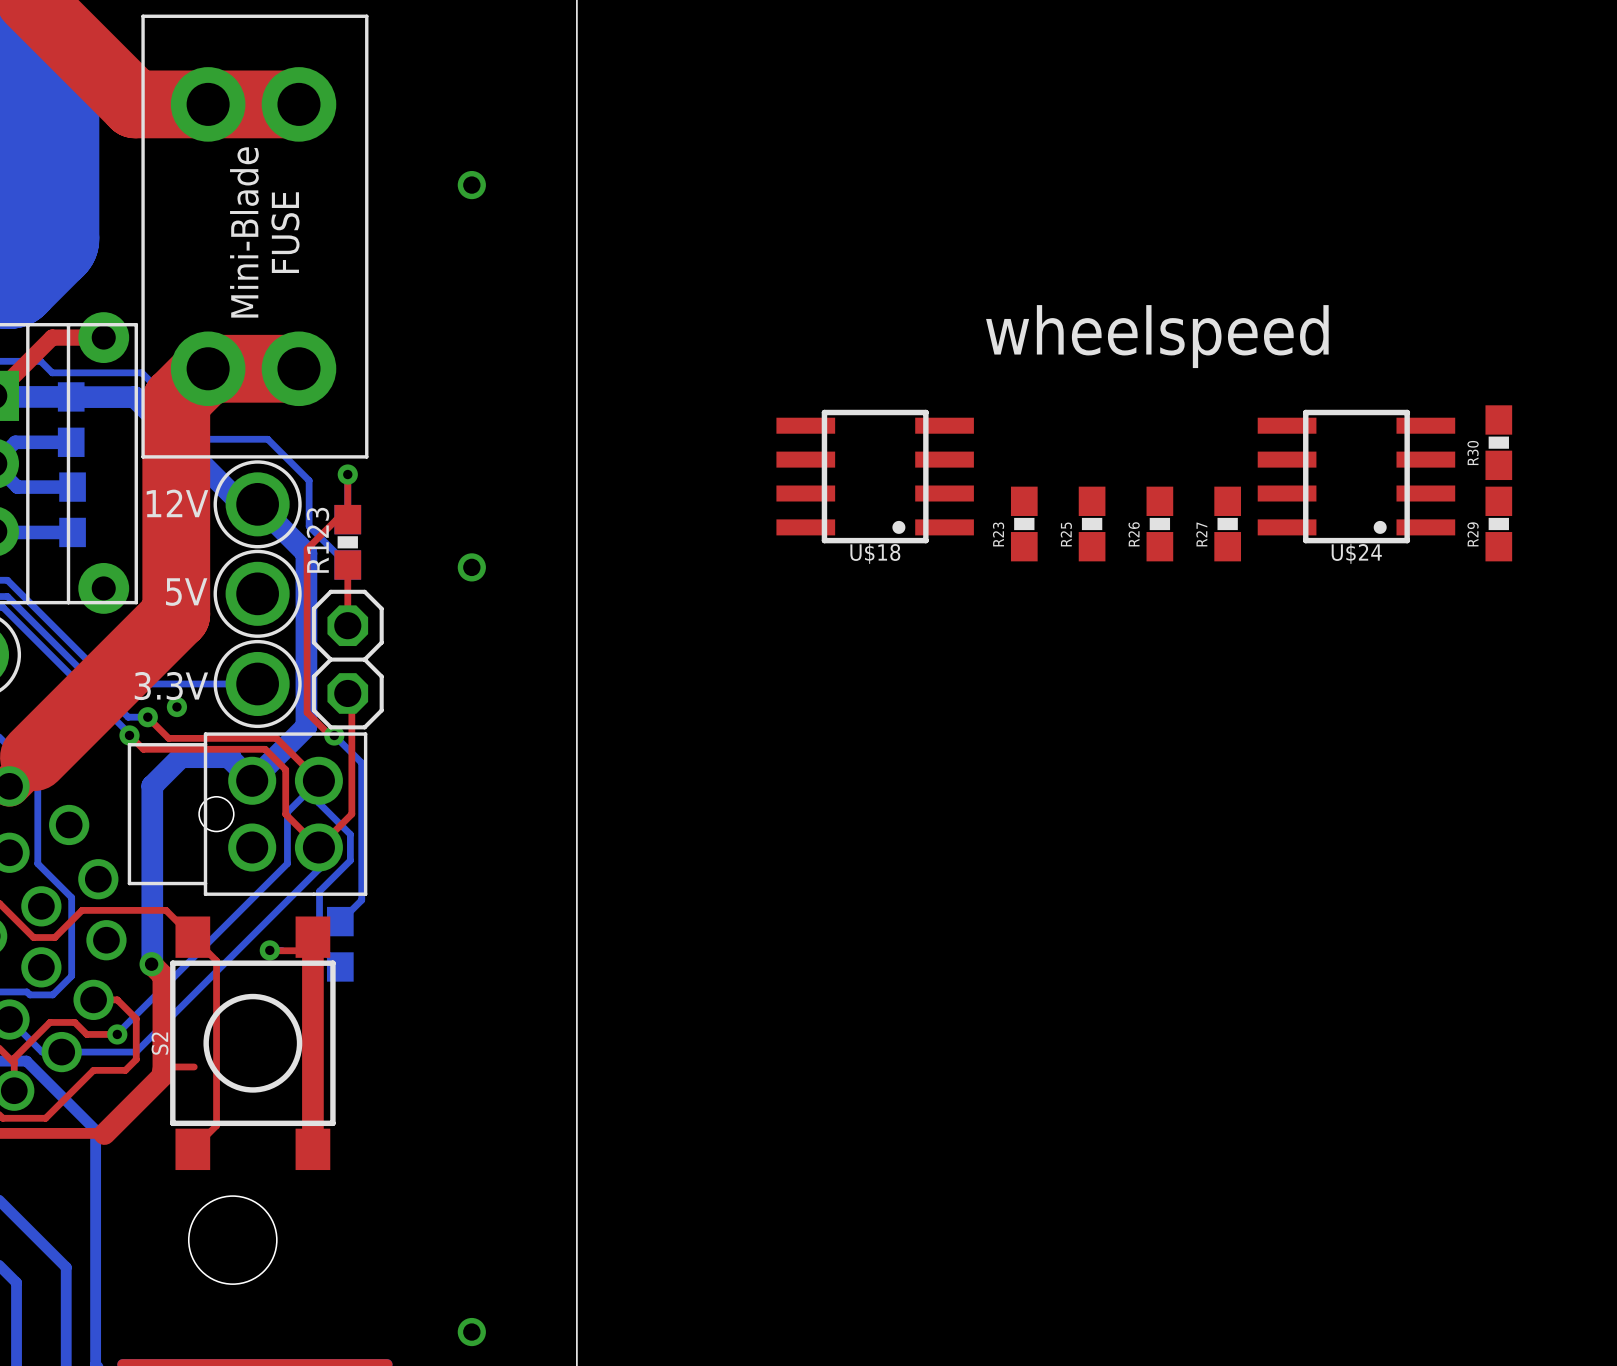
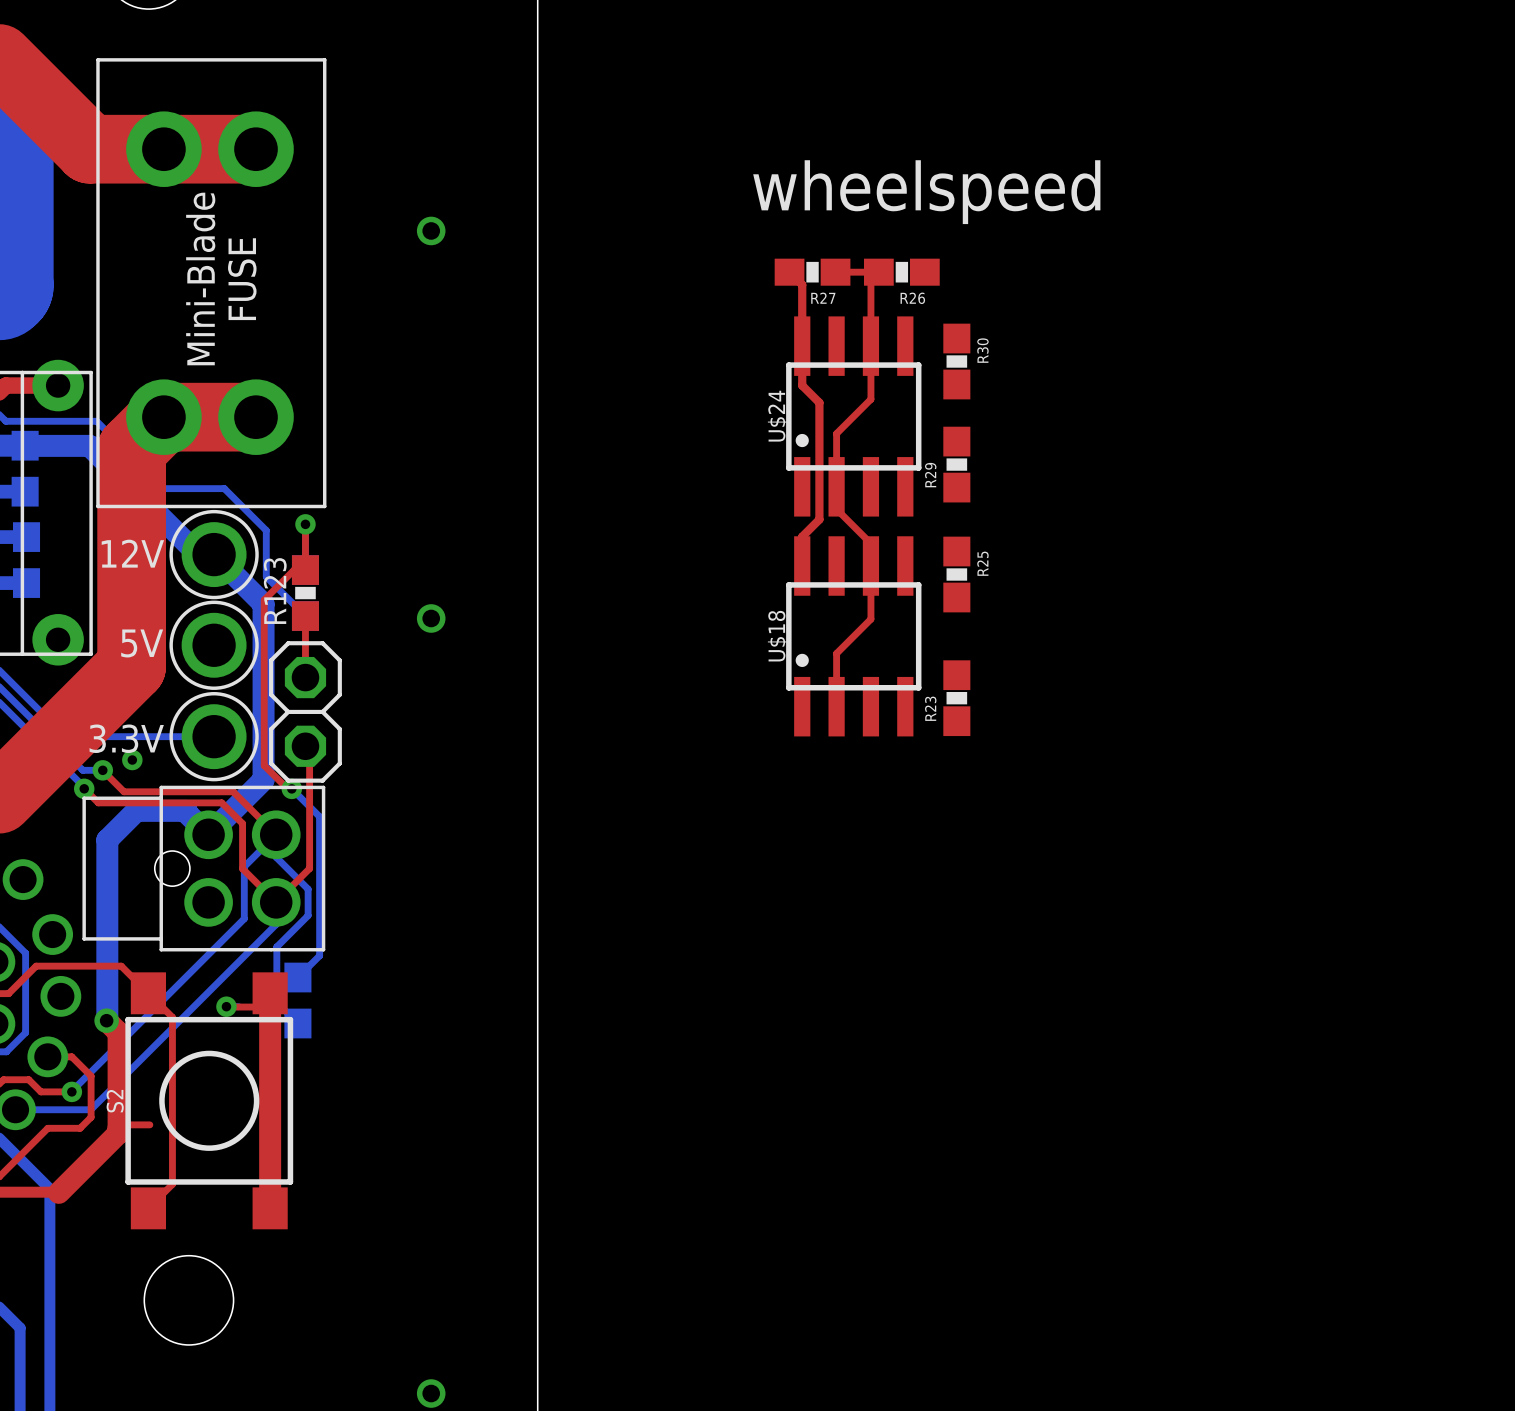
top track: none -> (789, 272) (802, 284) (802, 385) (819, 402) (819, 519) (802, 536) (802, 566)
top track: none -> (835, 272) (878, 272) (870, 280) (870, 399) (836, 433) (836, 509) (870, 543) (870, 619) (836, 653) (836, 706)
text position: wheelspeed (1157, 336) -> wheelspeed (926, 192)
R30 position: (1498, 442) -> (956, 361)
R30 name position: R30 (1473, 453) -> R30 (982, 350)
U$18 rotation: 0° (875, 476) -> 90° clockwise (853, 636)
U$24 rotation: 0° (1356, 476) -> 90° clockwise (853, 416)
U$24 position: (1356, 476) -> (853, 416)
R23 position: (1024, 524) -> (956, 698)
R25 position: (1092, 524) -> (956, 574)
R26 rotation: 0° (1159, 524) -> 90° clockwise (901, 272)
R26 position: (1159, 524) -> (901, 272)
R27 rotation: 0° (1227, 524) -> 90° clockwise (812, 272)
R27 position: (1227, 524) -> (812, 272)
R29 position: (1498, 524) -> (956, 464)
R25 name position: R25 (1066, 534) -> R25 (982, 563)

